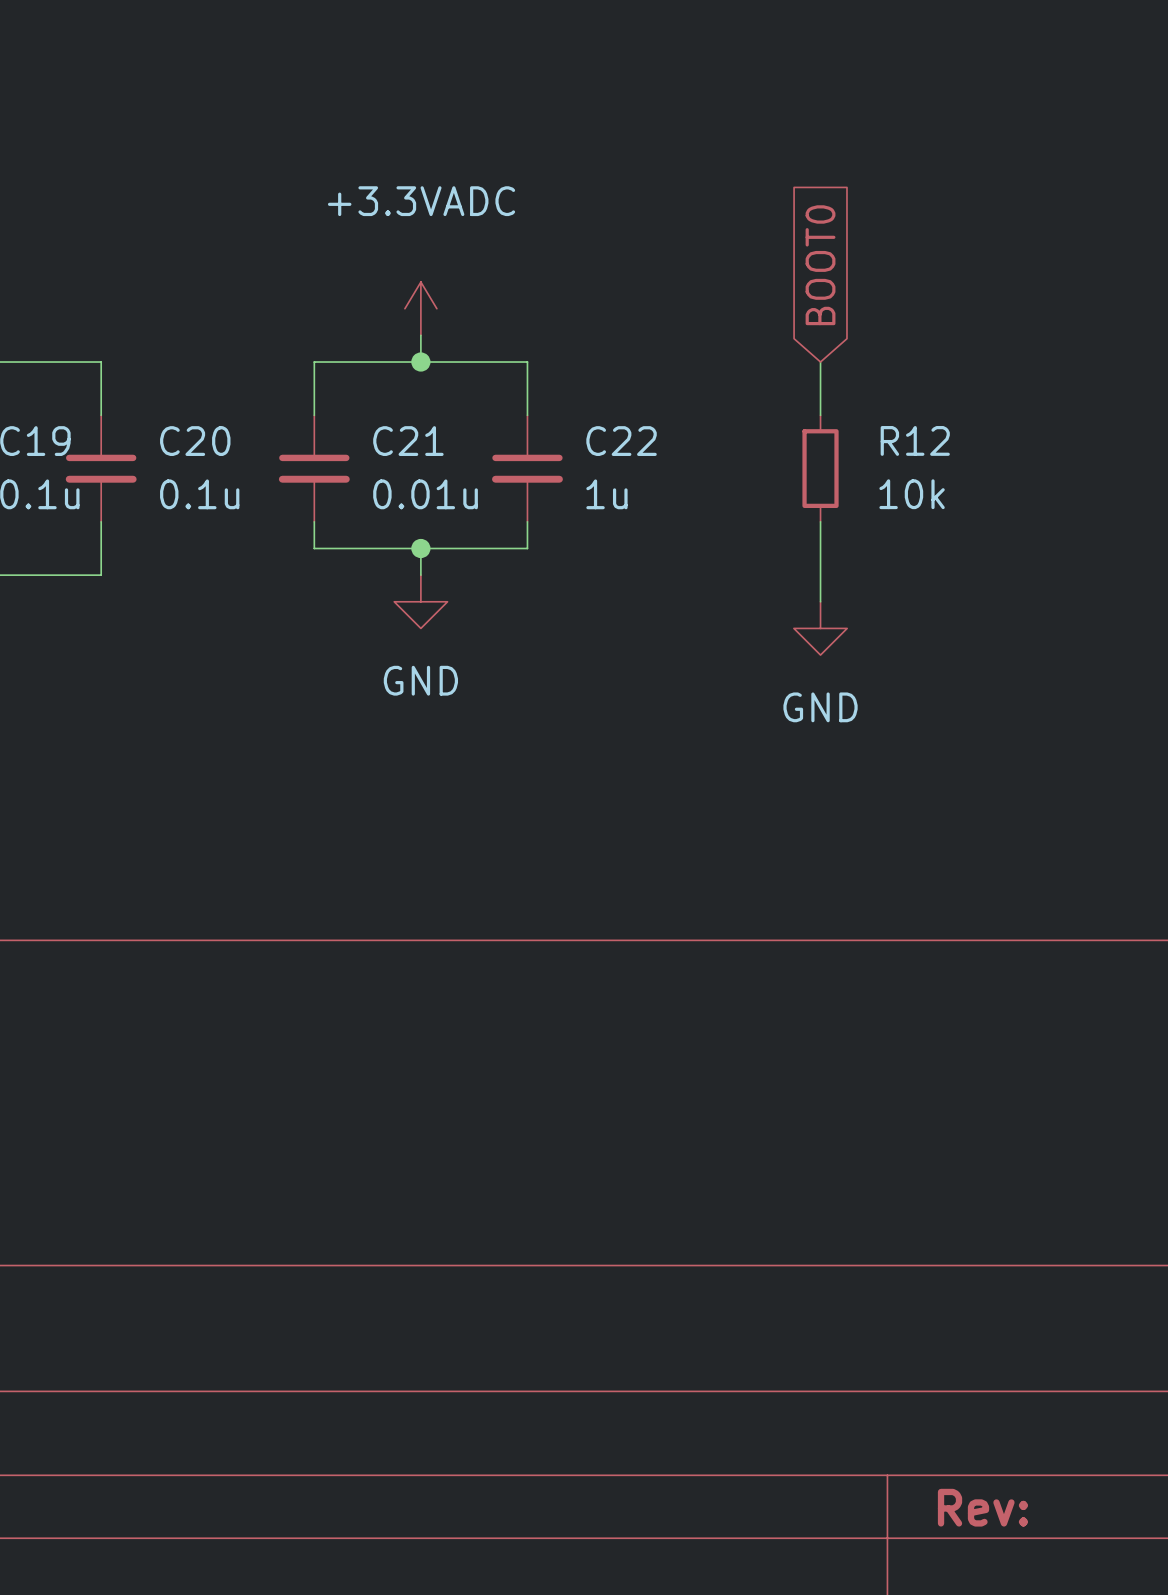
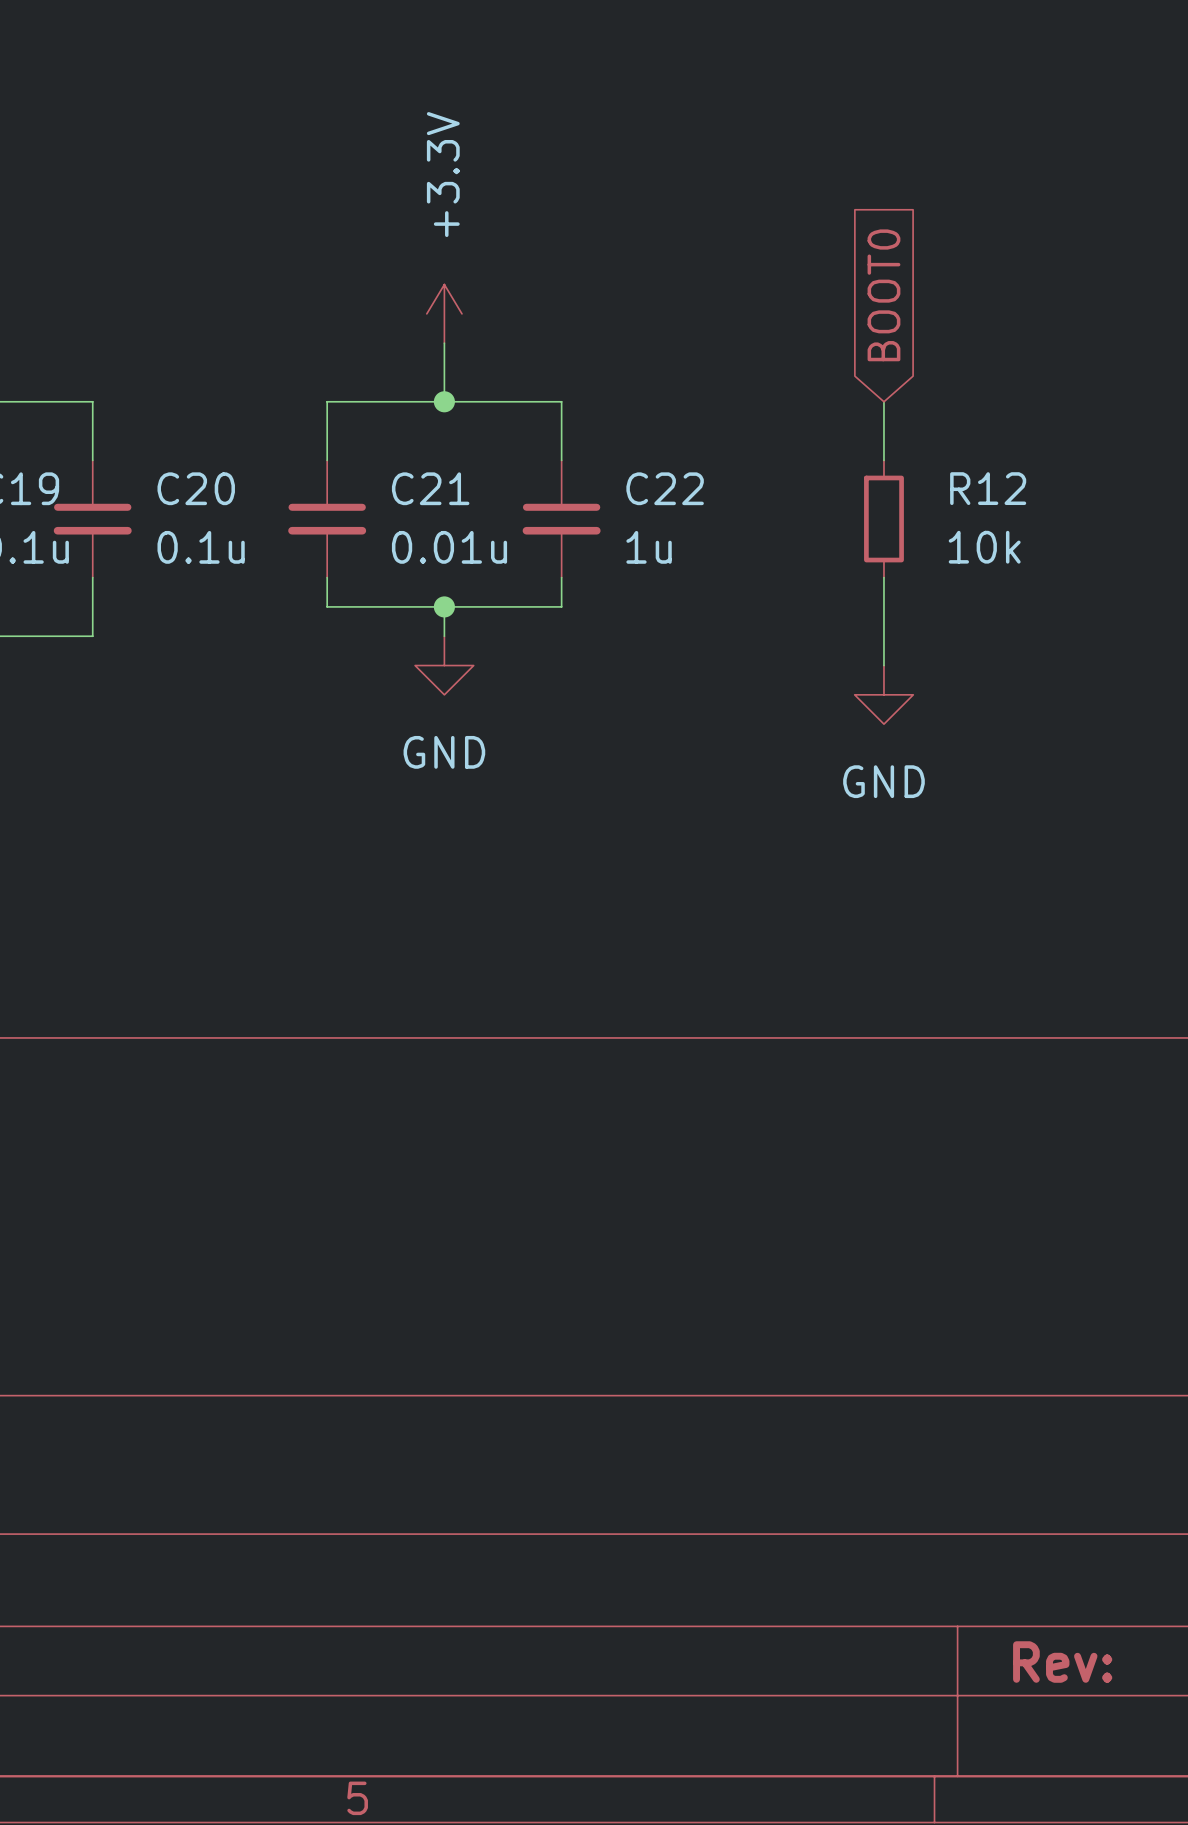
power symbol: none -> +3.3V (444, 313)
power symbol: +3.3VADC (420, 308) -> none

